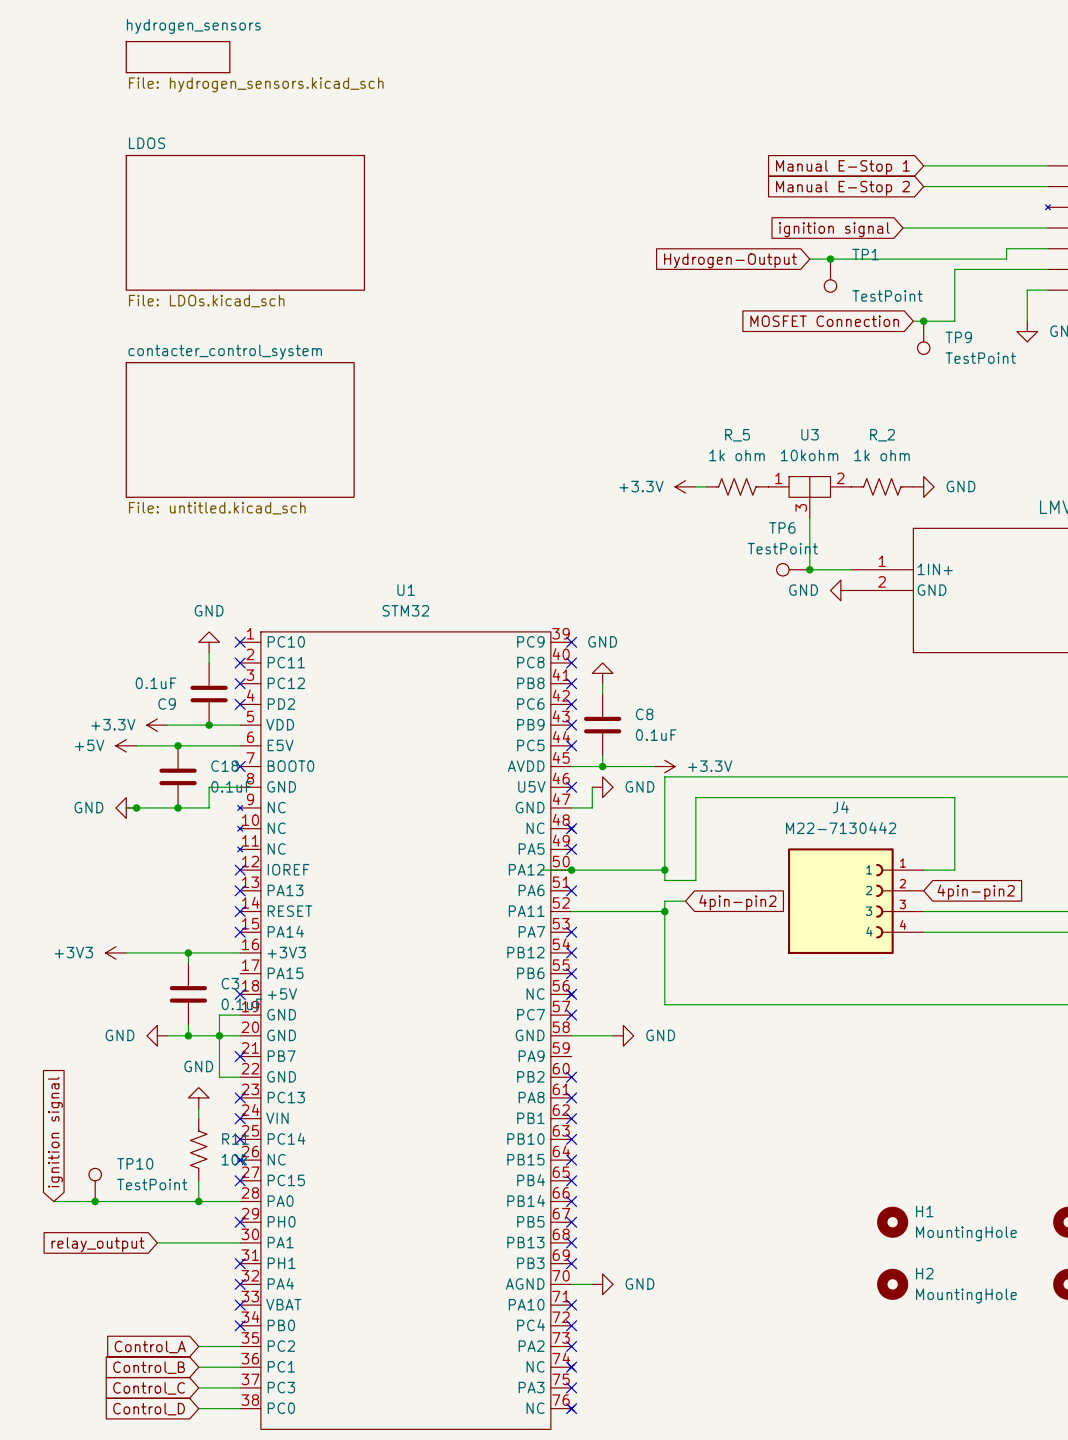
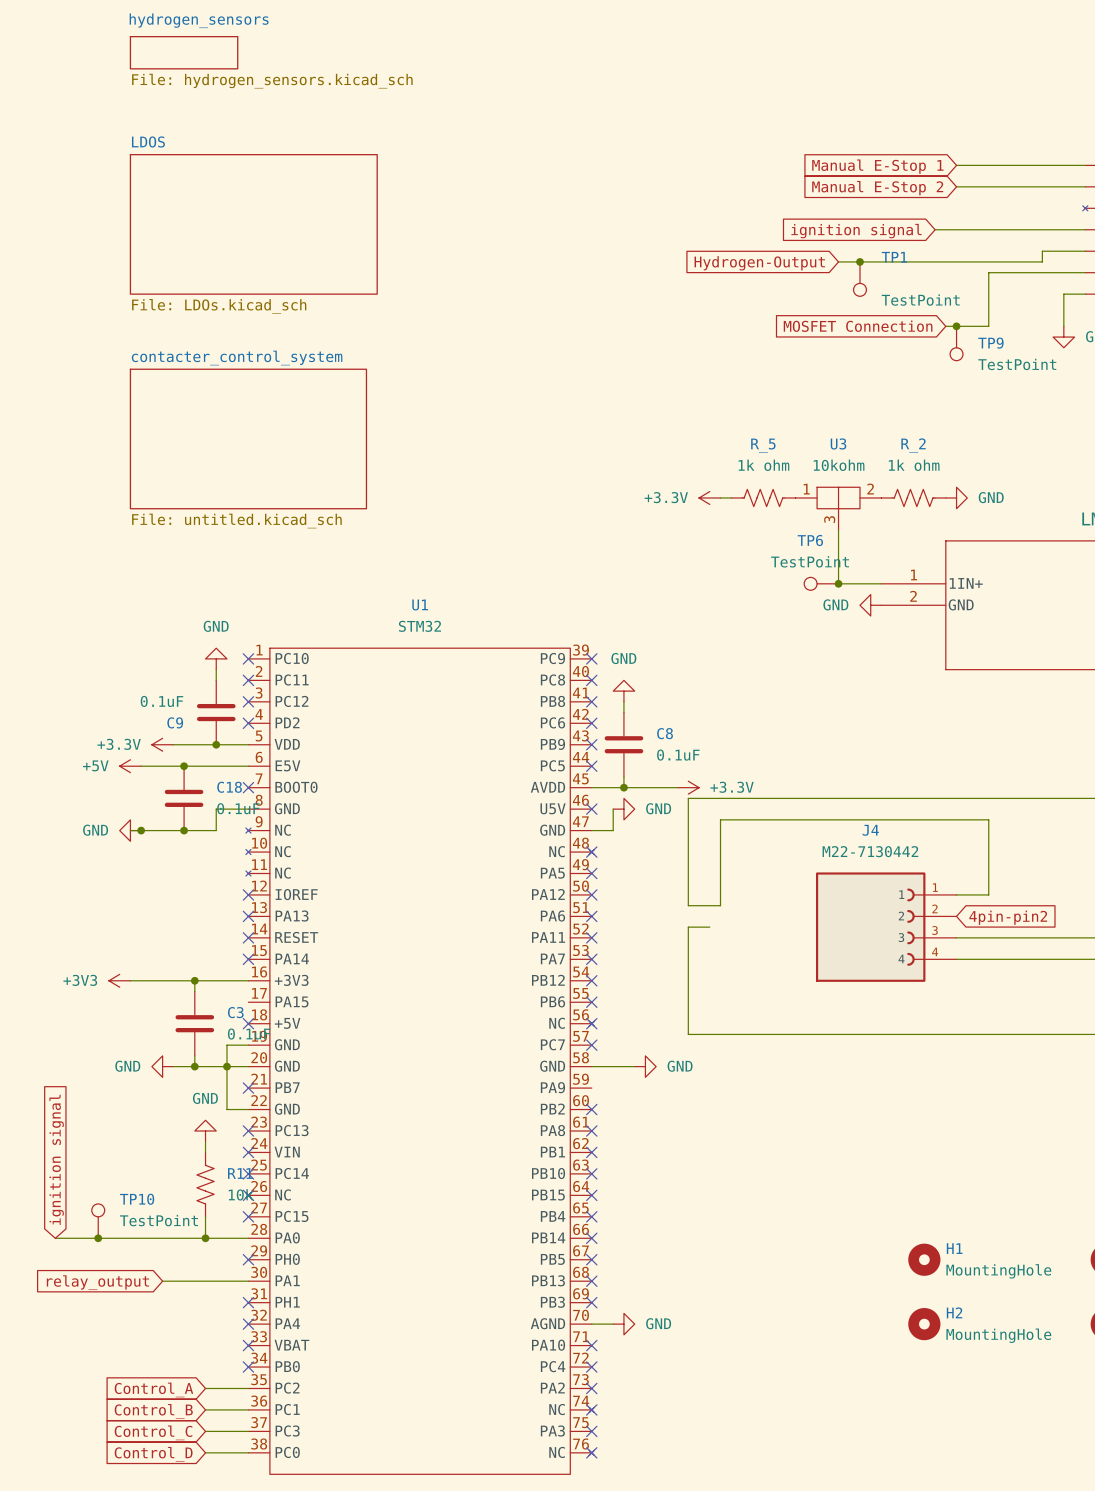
wire: (540, 870) (664, 870) -> none
junction: (571, 870) -> none
no-connect mark: none -> (591, 894)
junction: (664, 870) -> none
global label: 4pin-pin2 (737, 902) -> none
wire: (571, 911) (664, 911) -> none
no-connect mark: none -> (591, 937)
junction: (664, 911) -> none

